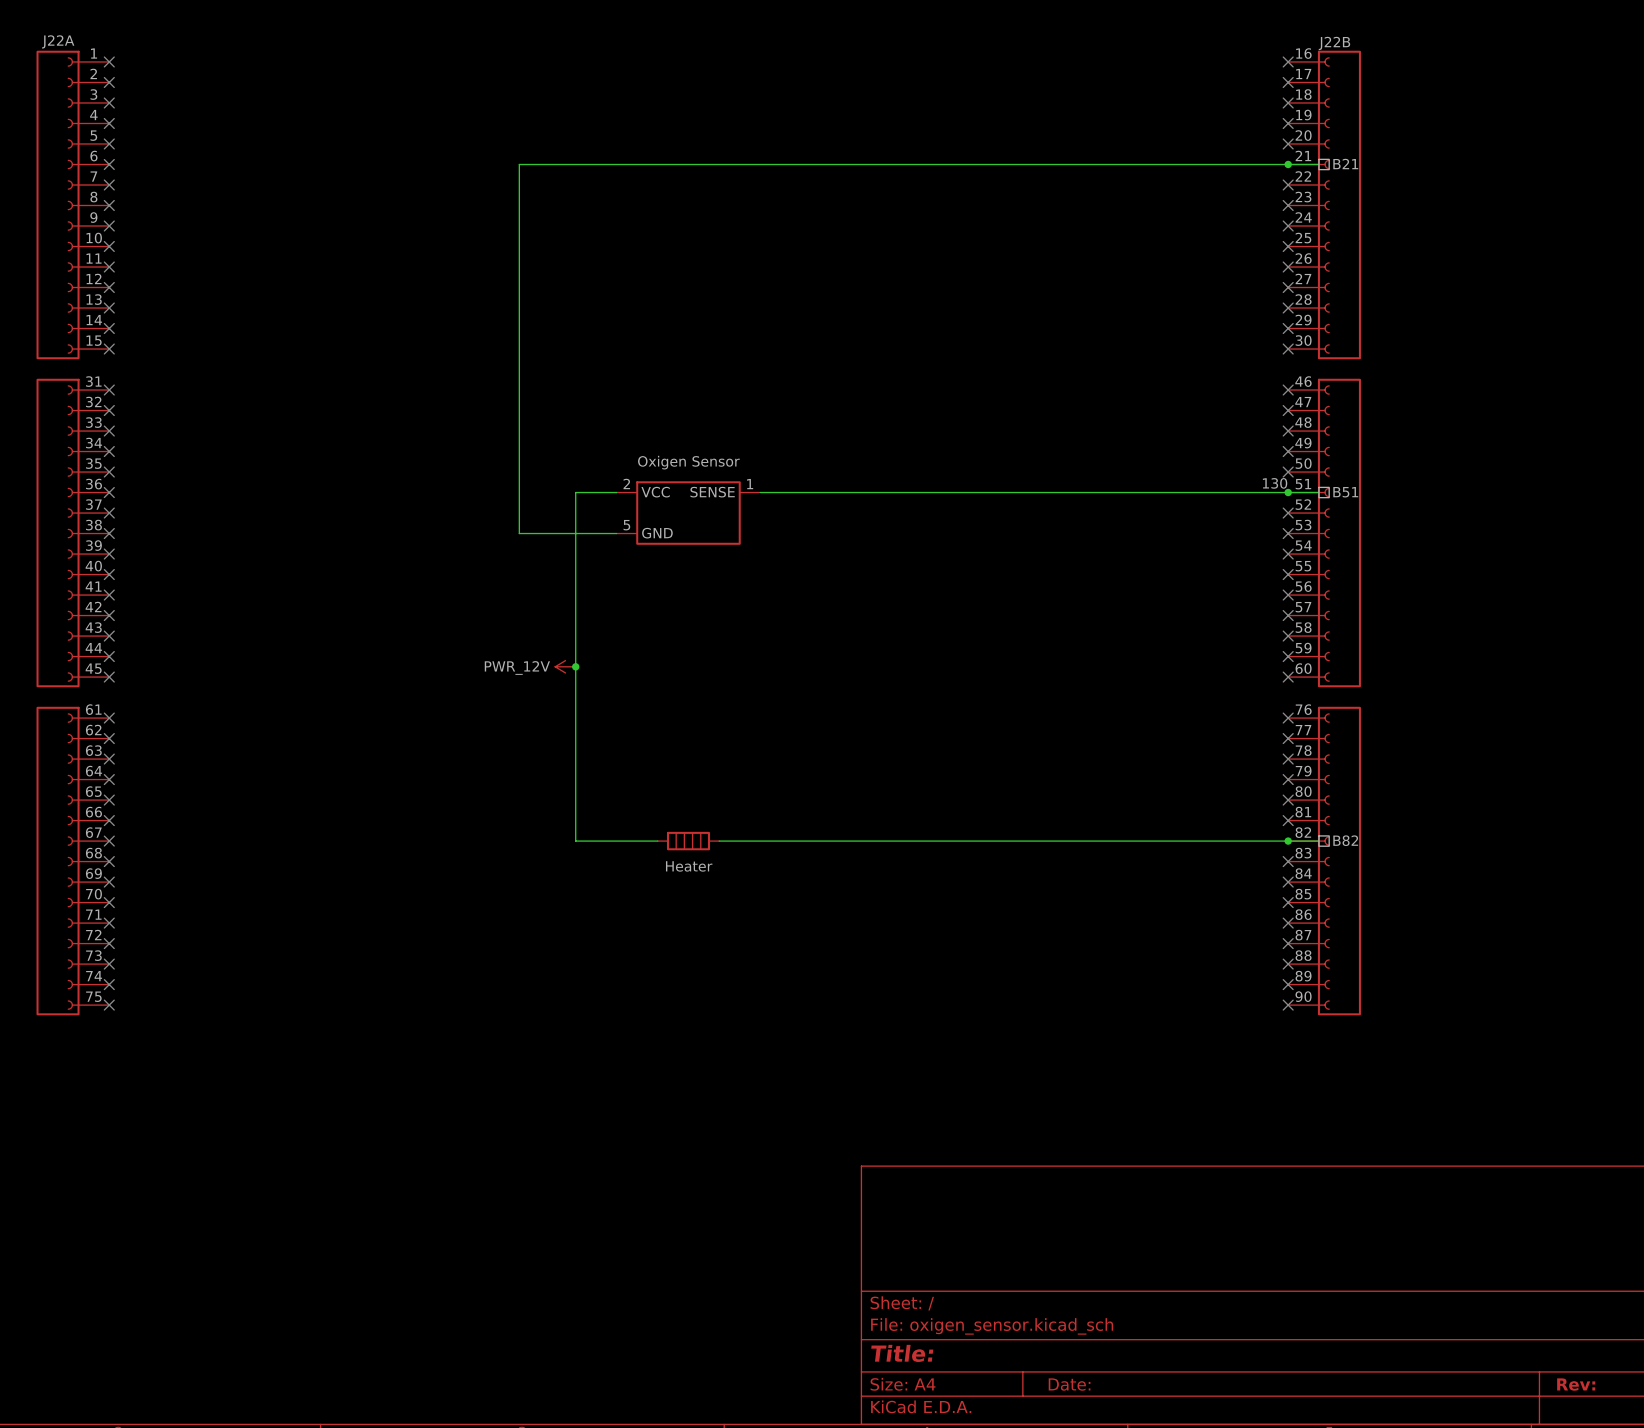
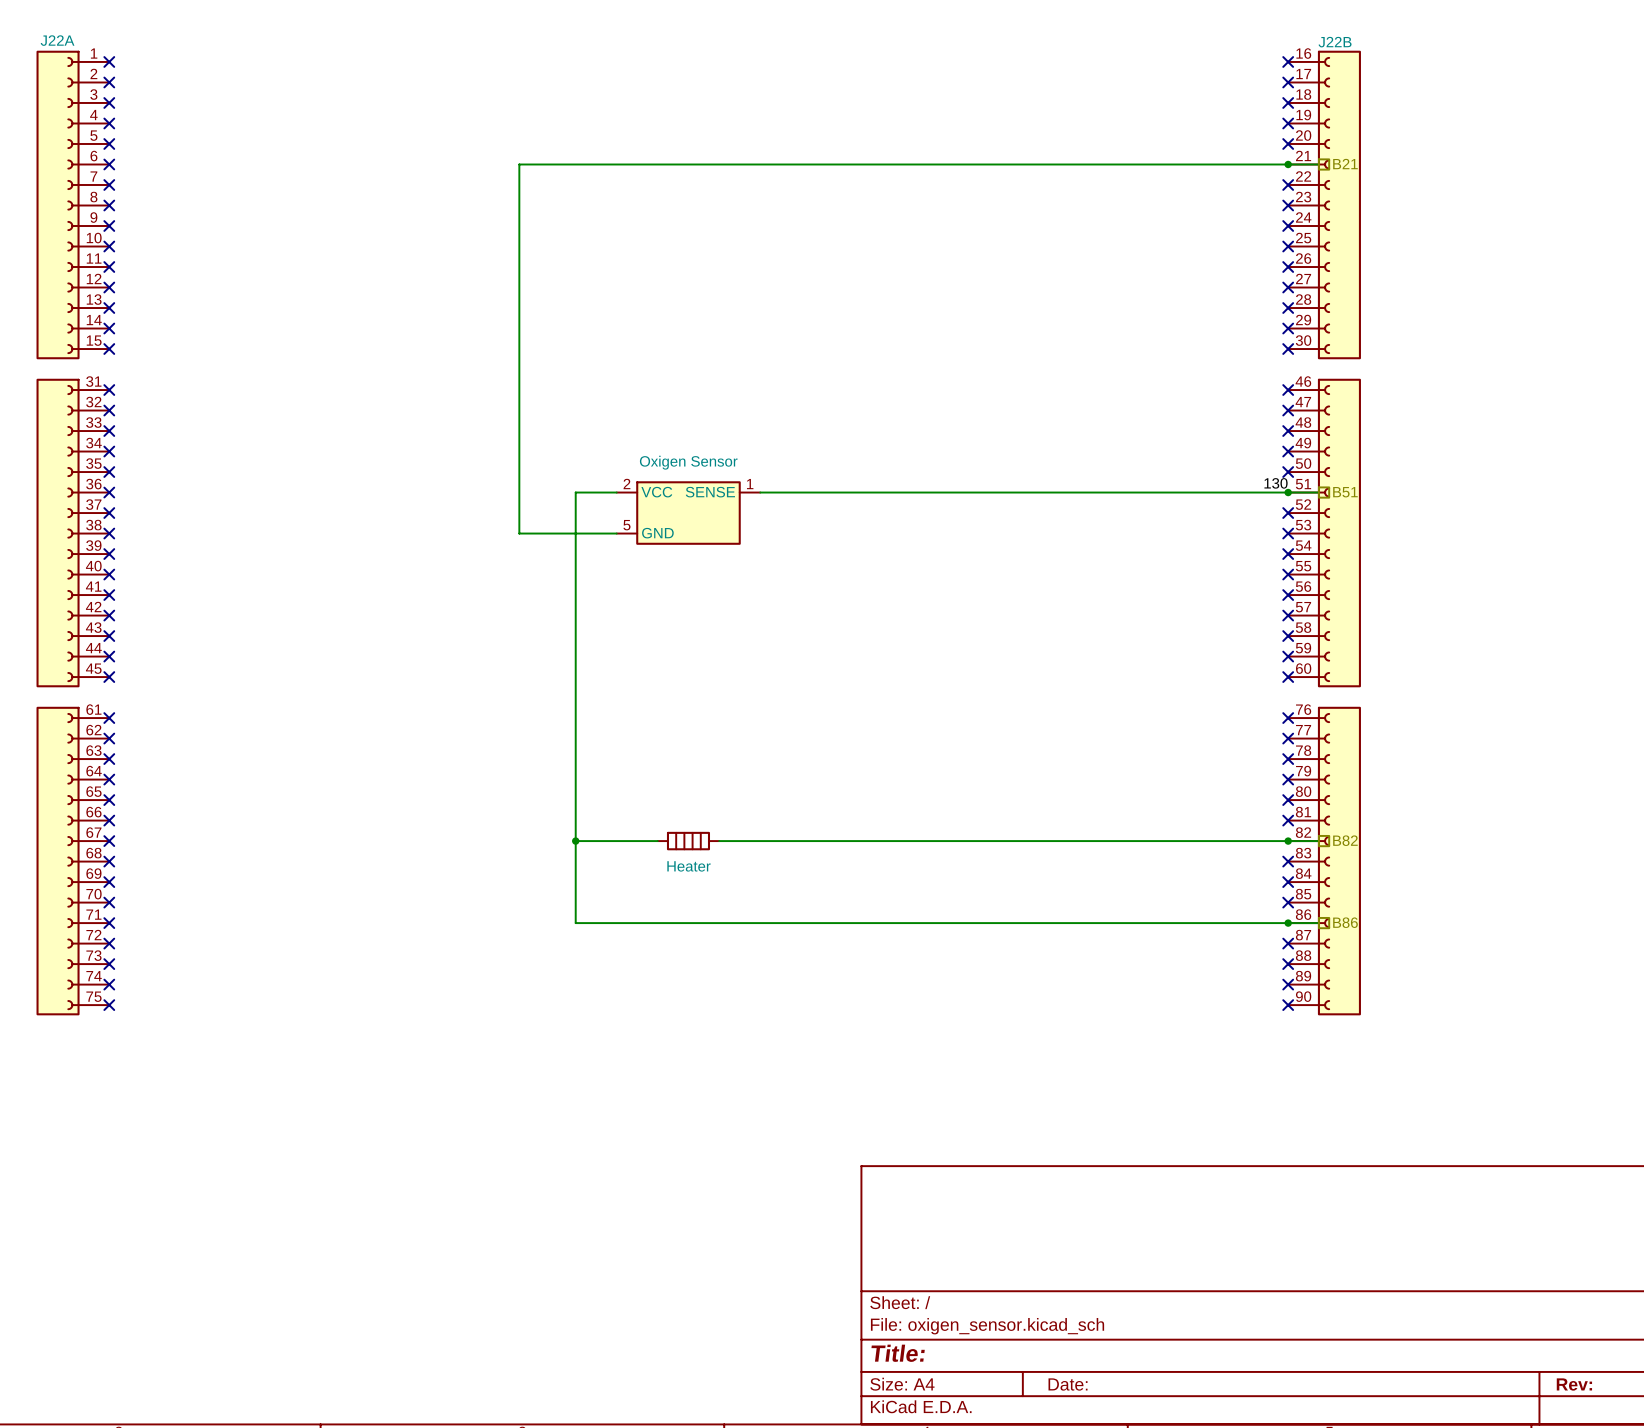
power symbol: PWR_12V (565, 666) -> none
junction: (575, 666) -> none
wire: none -> (575, 841) (575, 923) (1318, 923)
junction: none -> (575, 841)
hierarchical label: none -> B86 (1345, 922)
junction: none -> (1288, 923)
no-connect mark: (1288, 923) -> none

